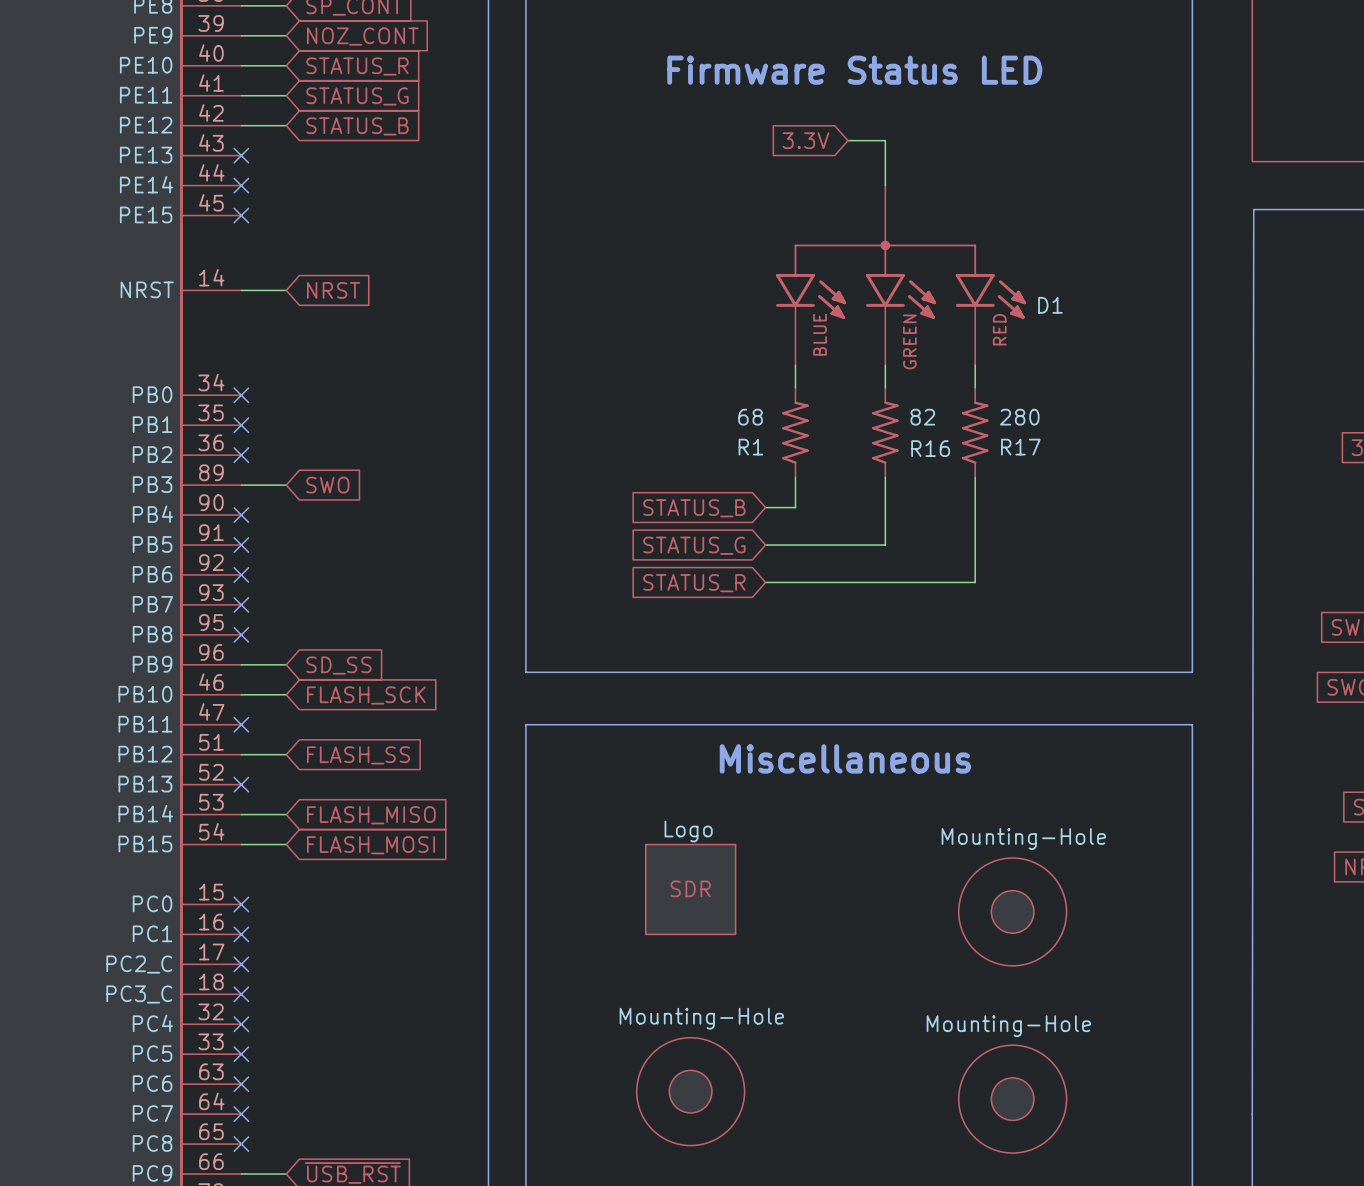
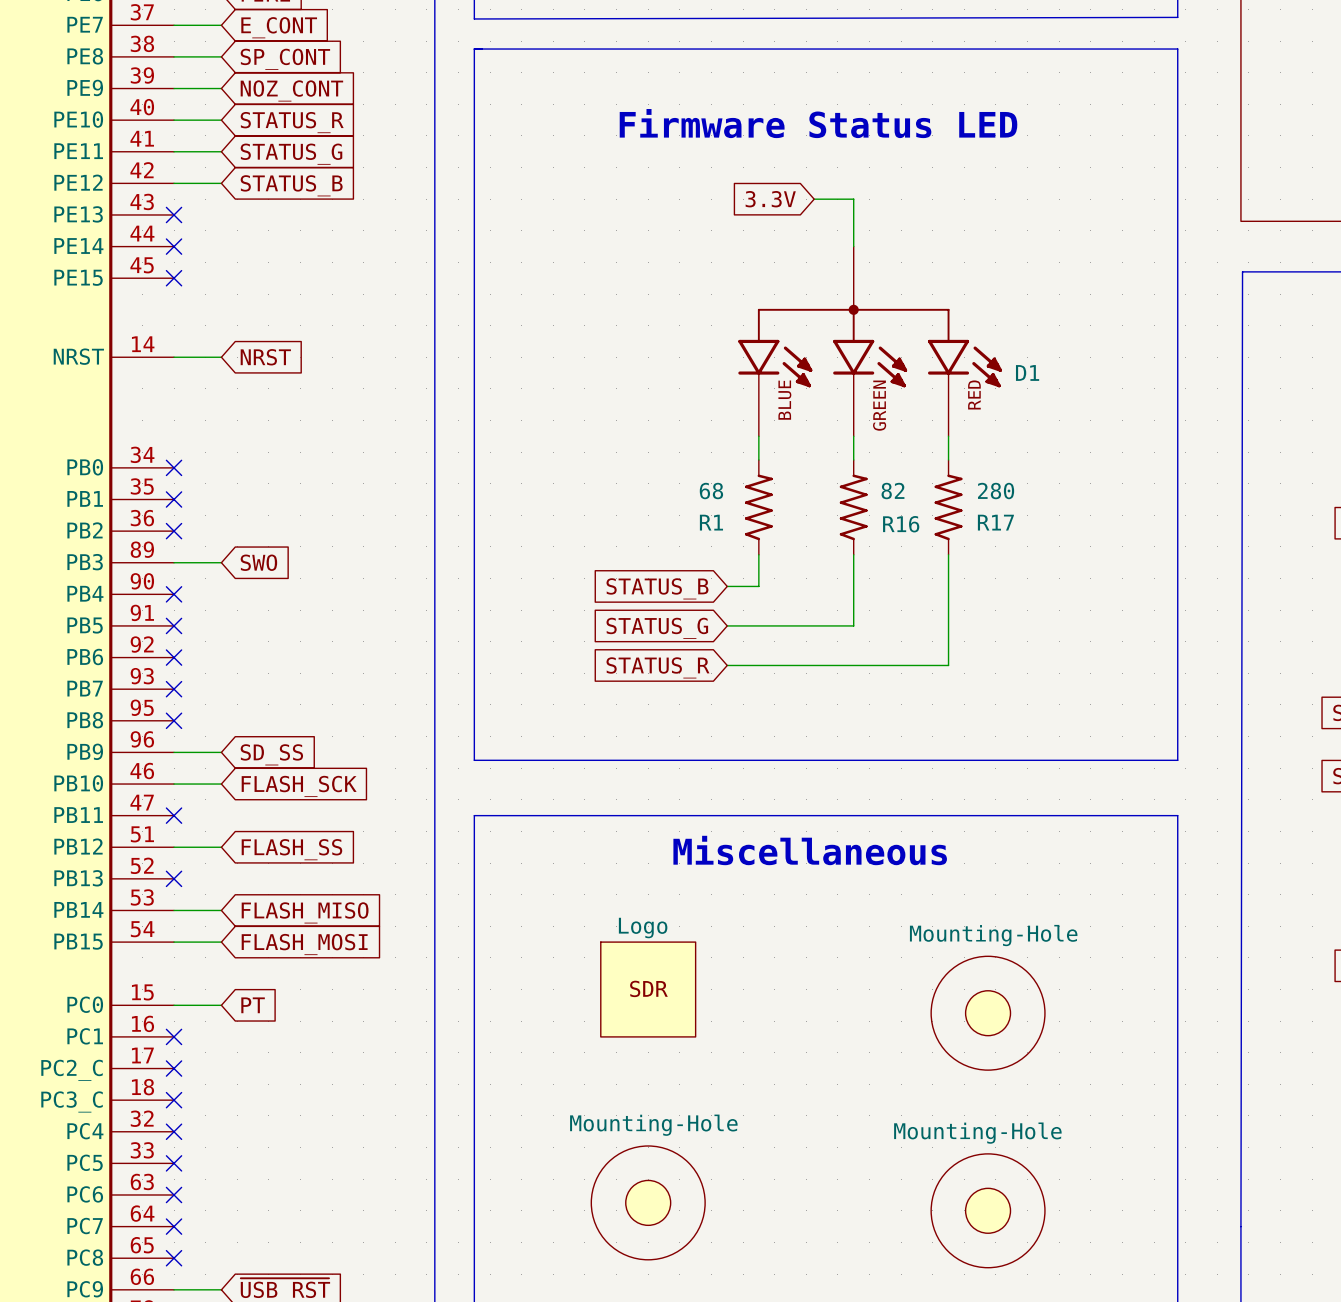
wire: none -> (174, 1005) (221, 1005)
no-connect mark: (241, 904) -> none
global label: none -> PT (253, 1005)

